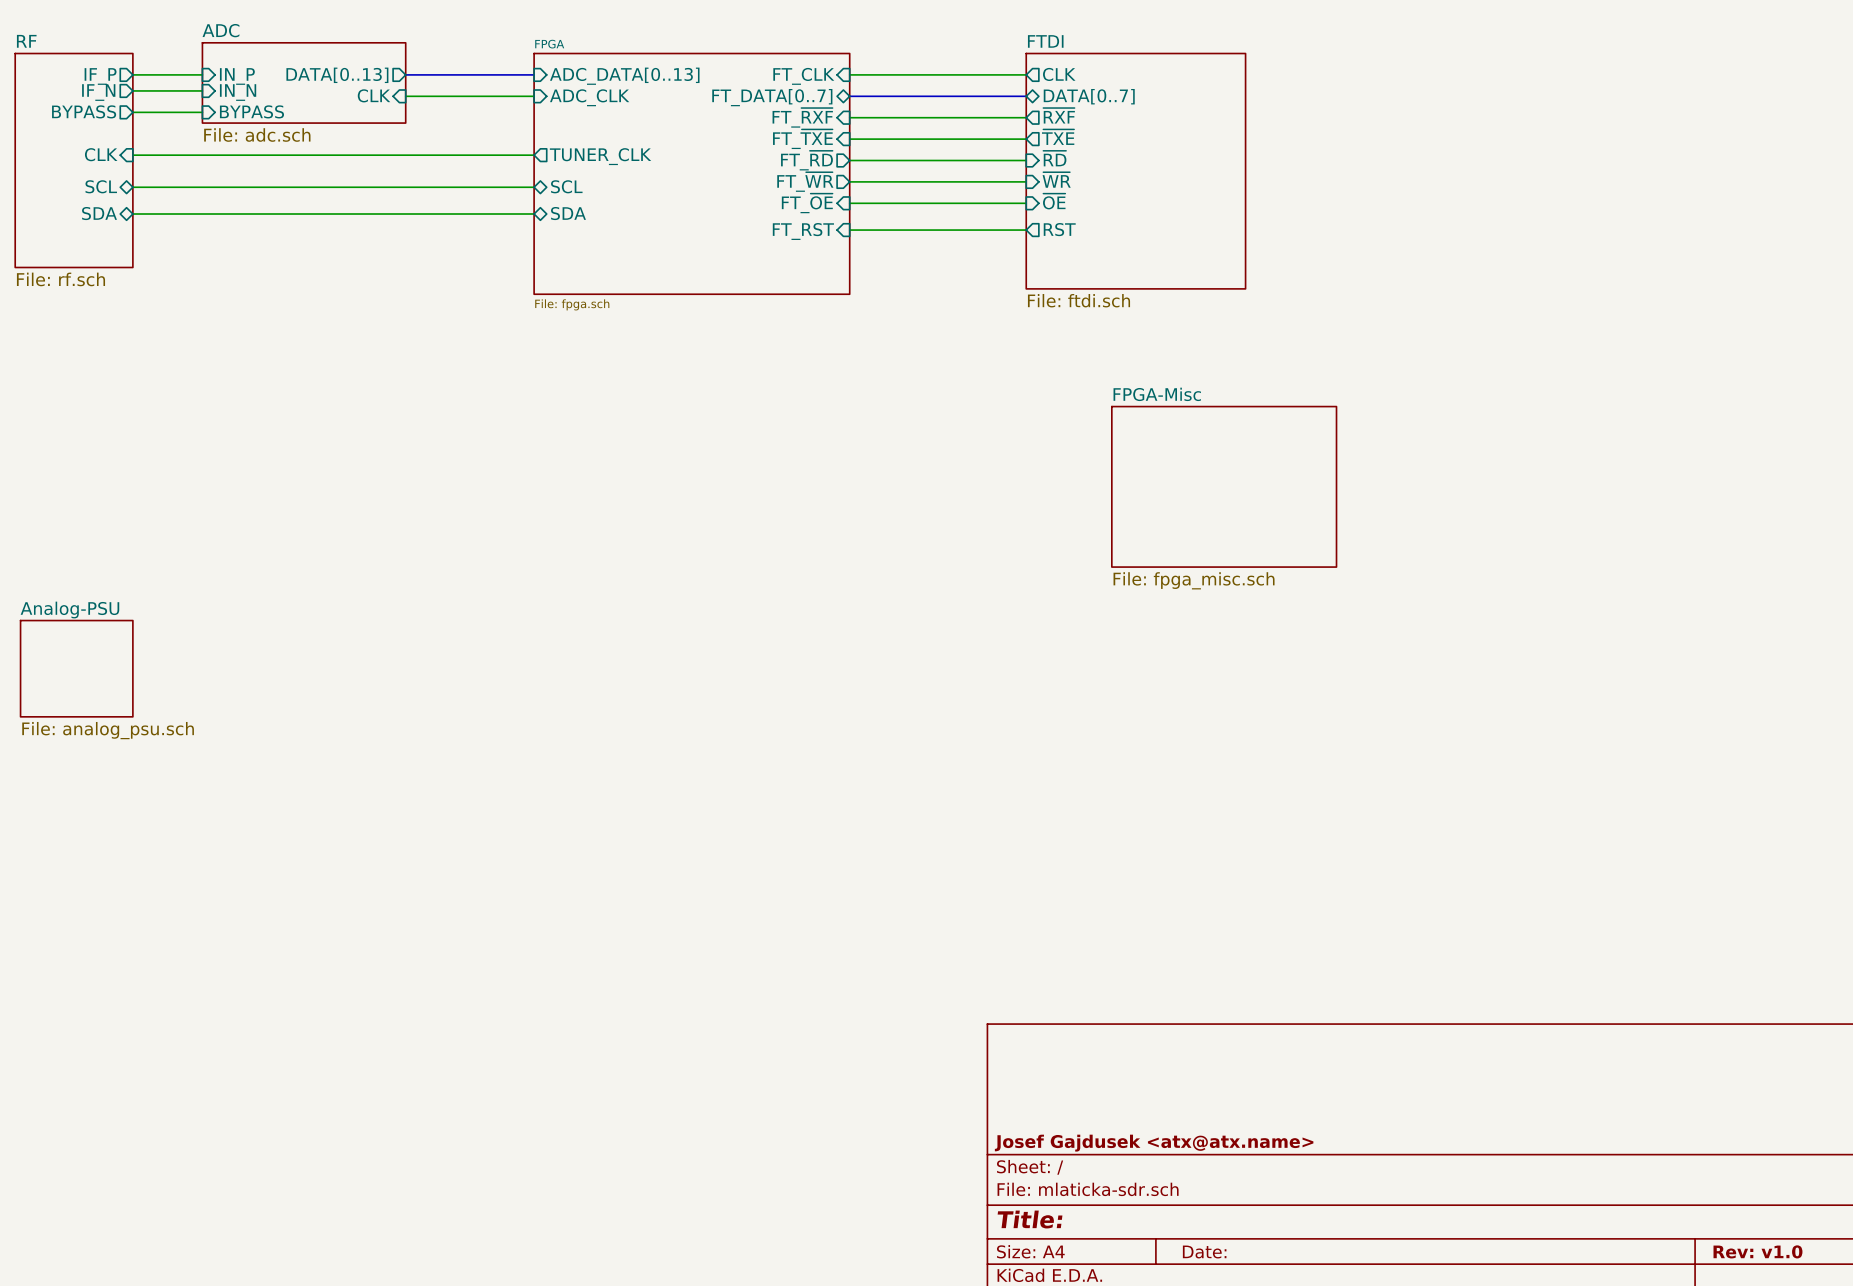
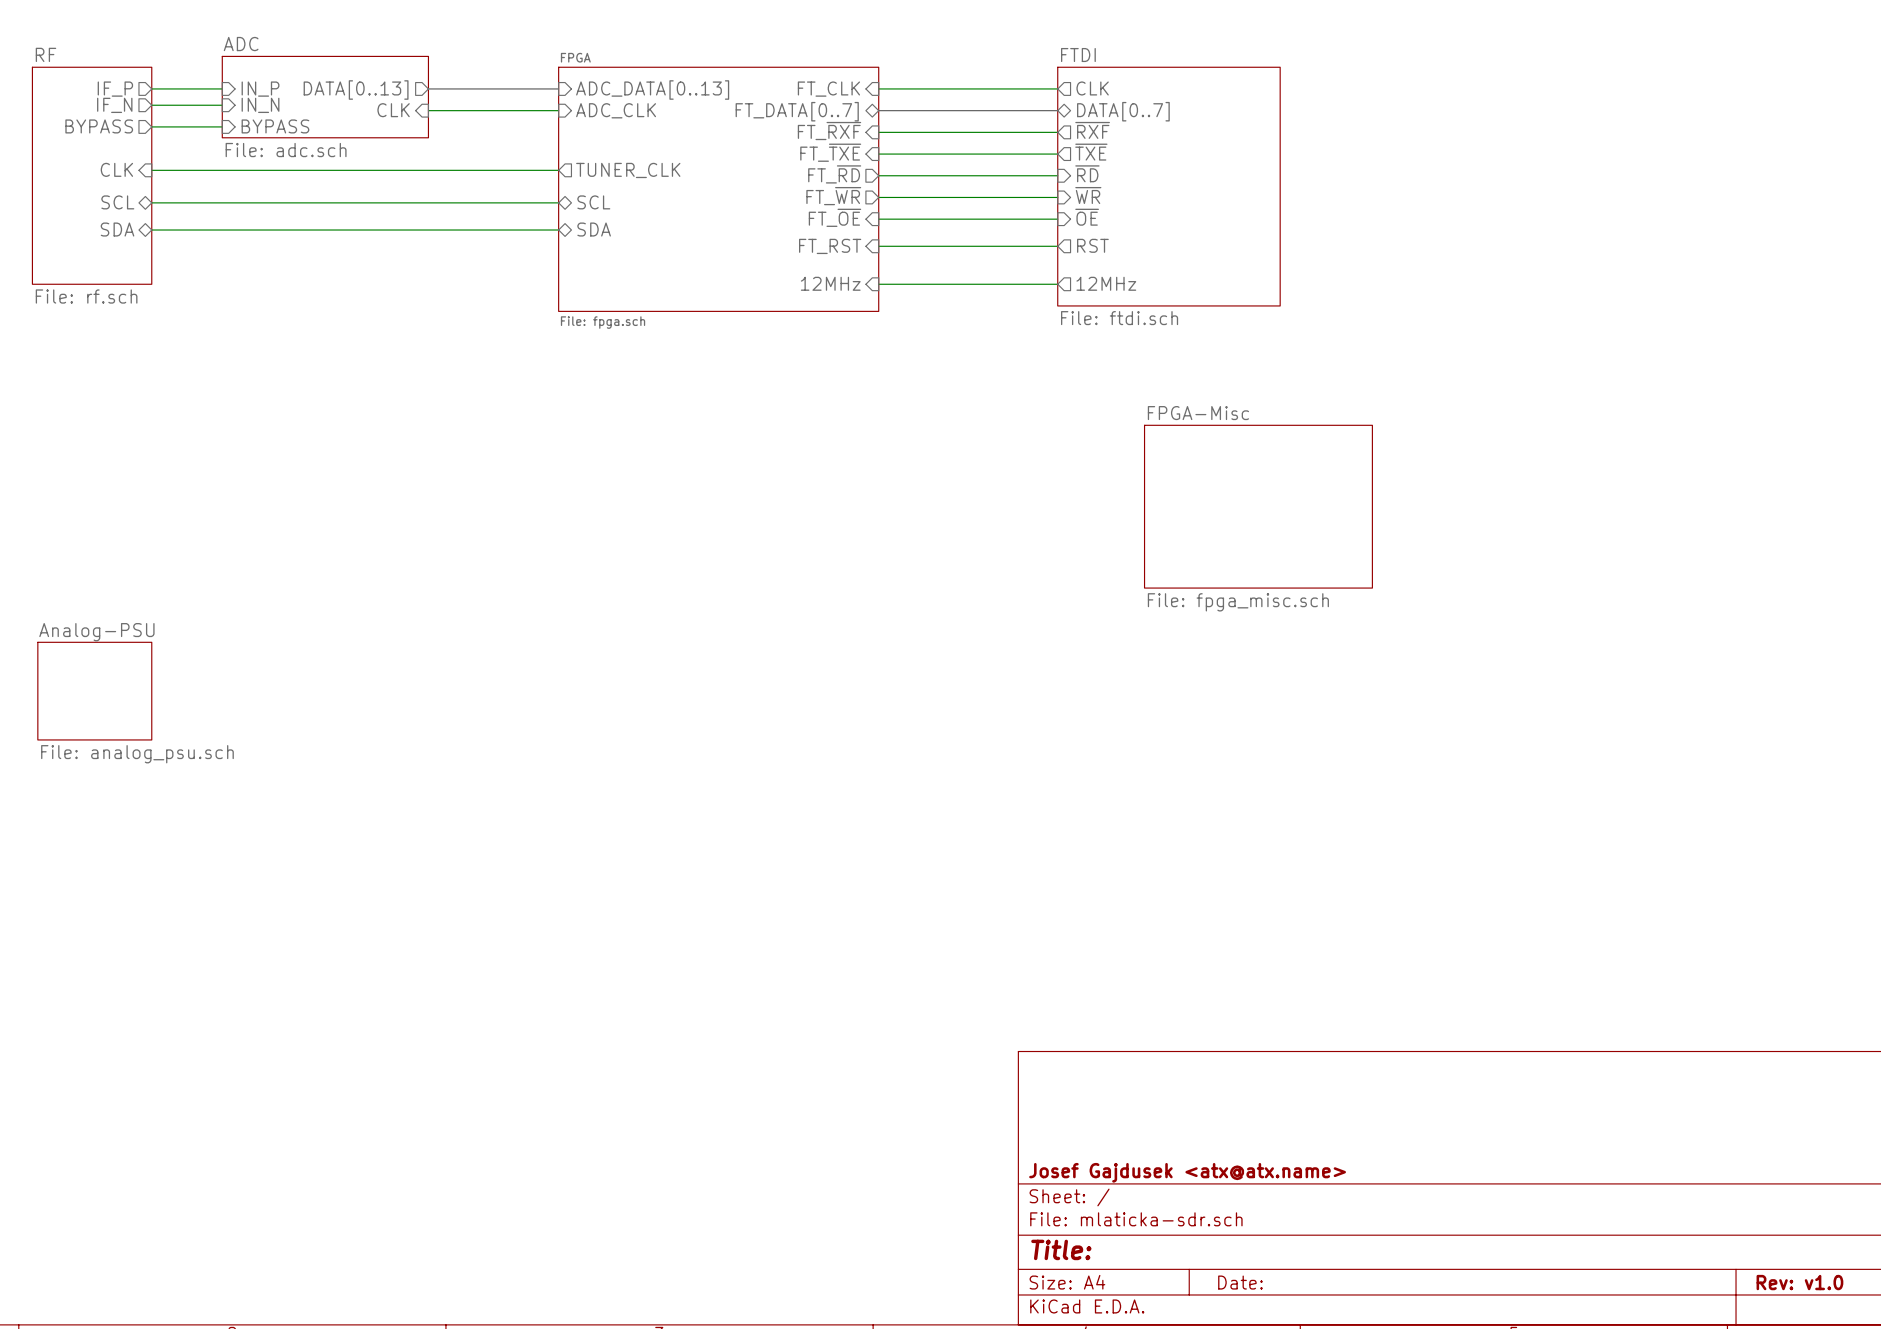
sheet pin: none -> 12MHz (830, 283)
sheet pin: none -> 12MHz (1106, 283)
wire: none -> (878, 284) (1057, 284)

